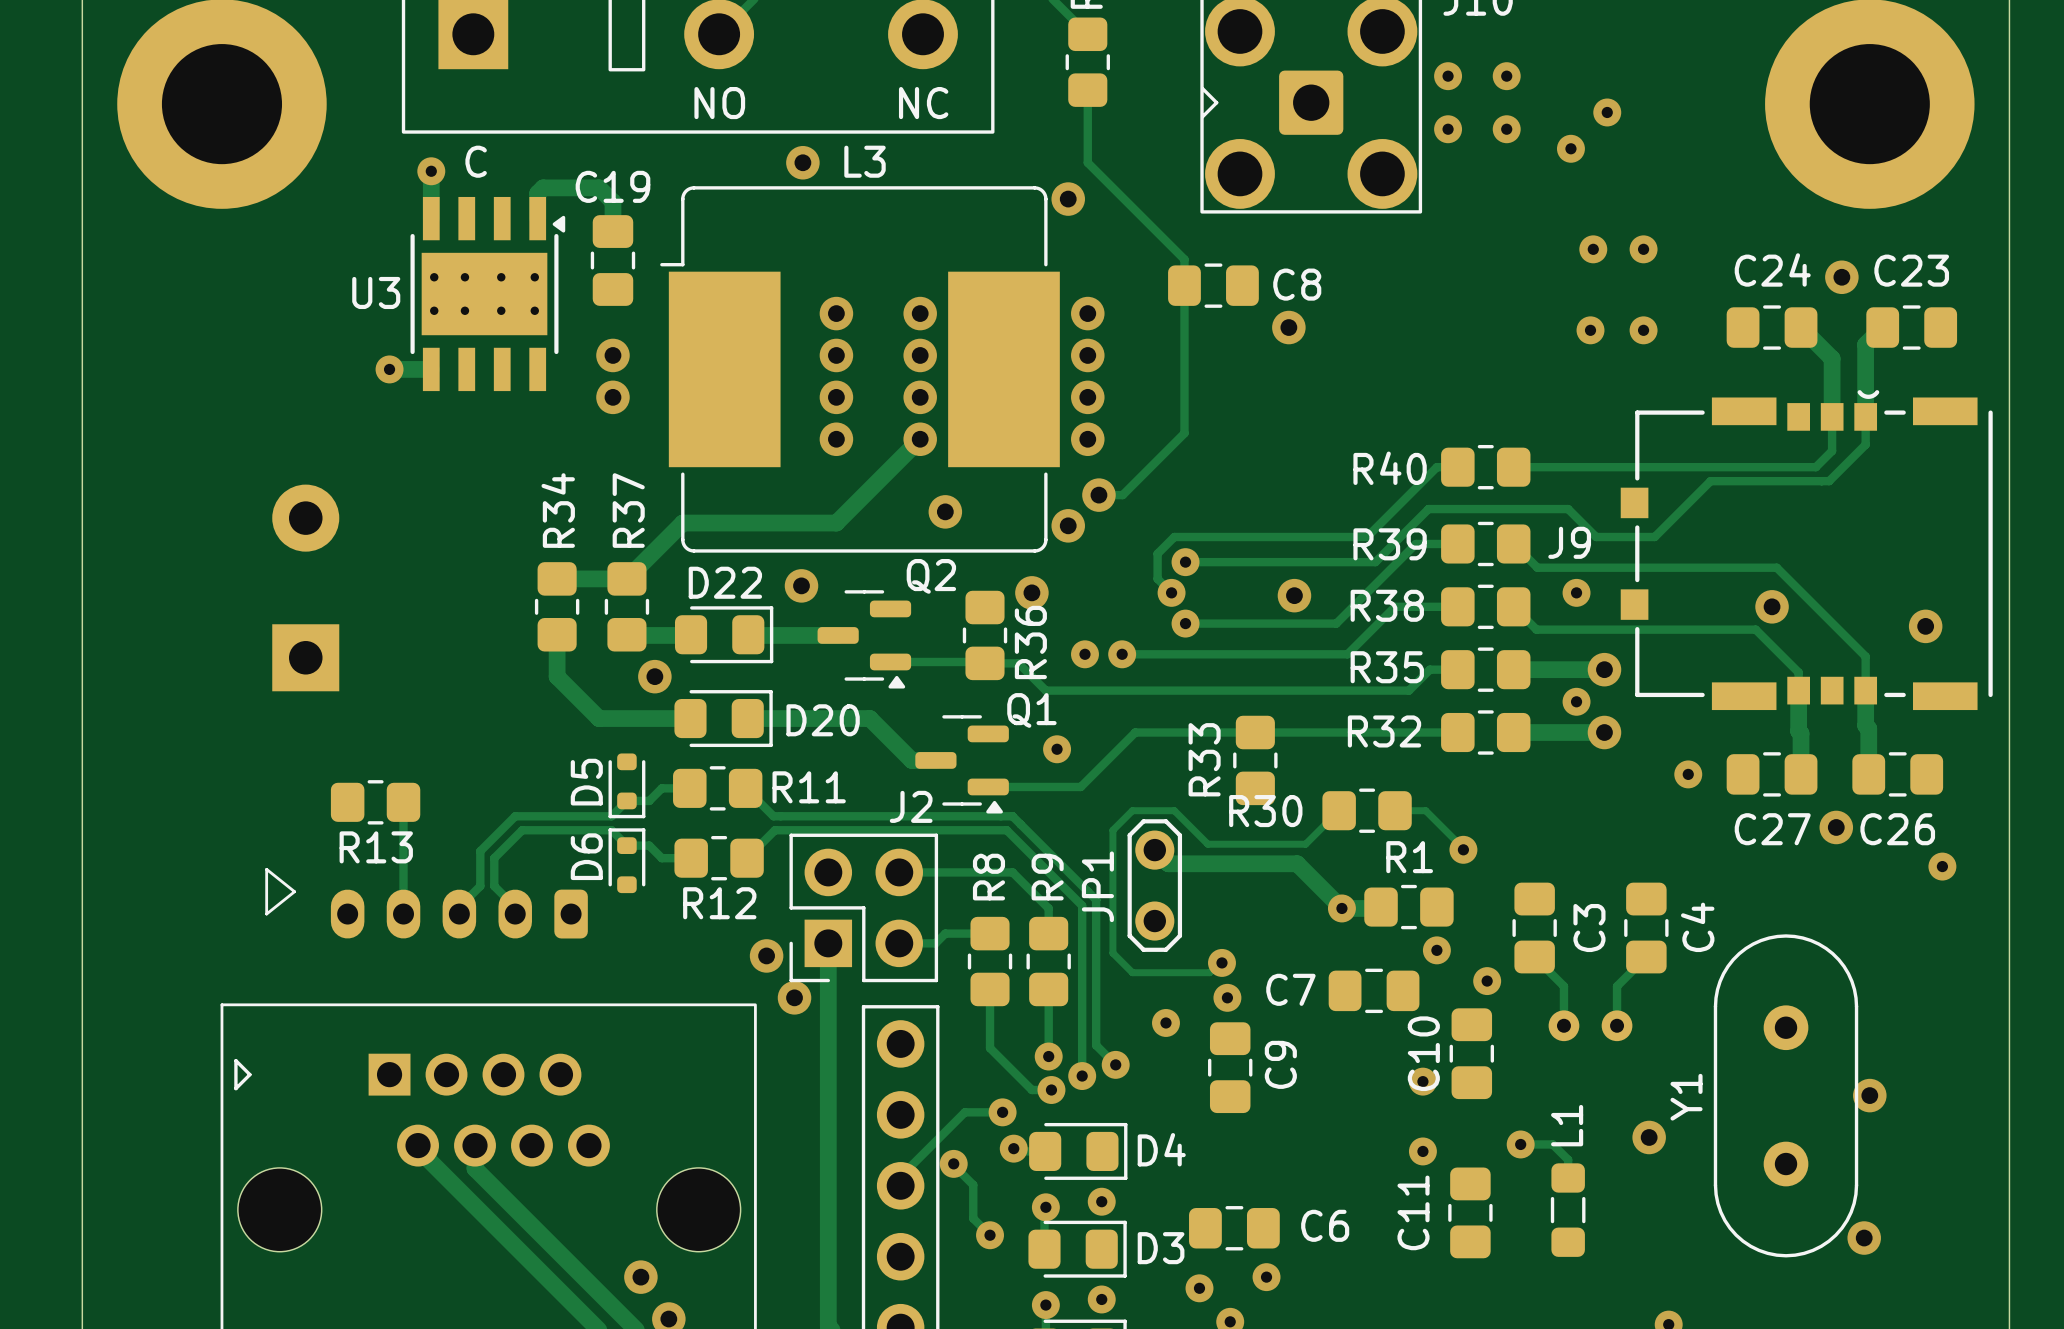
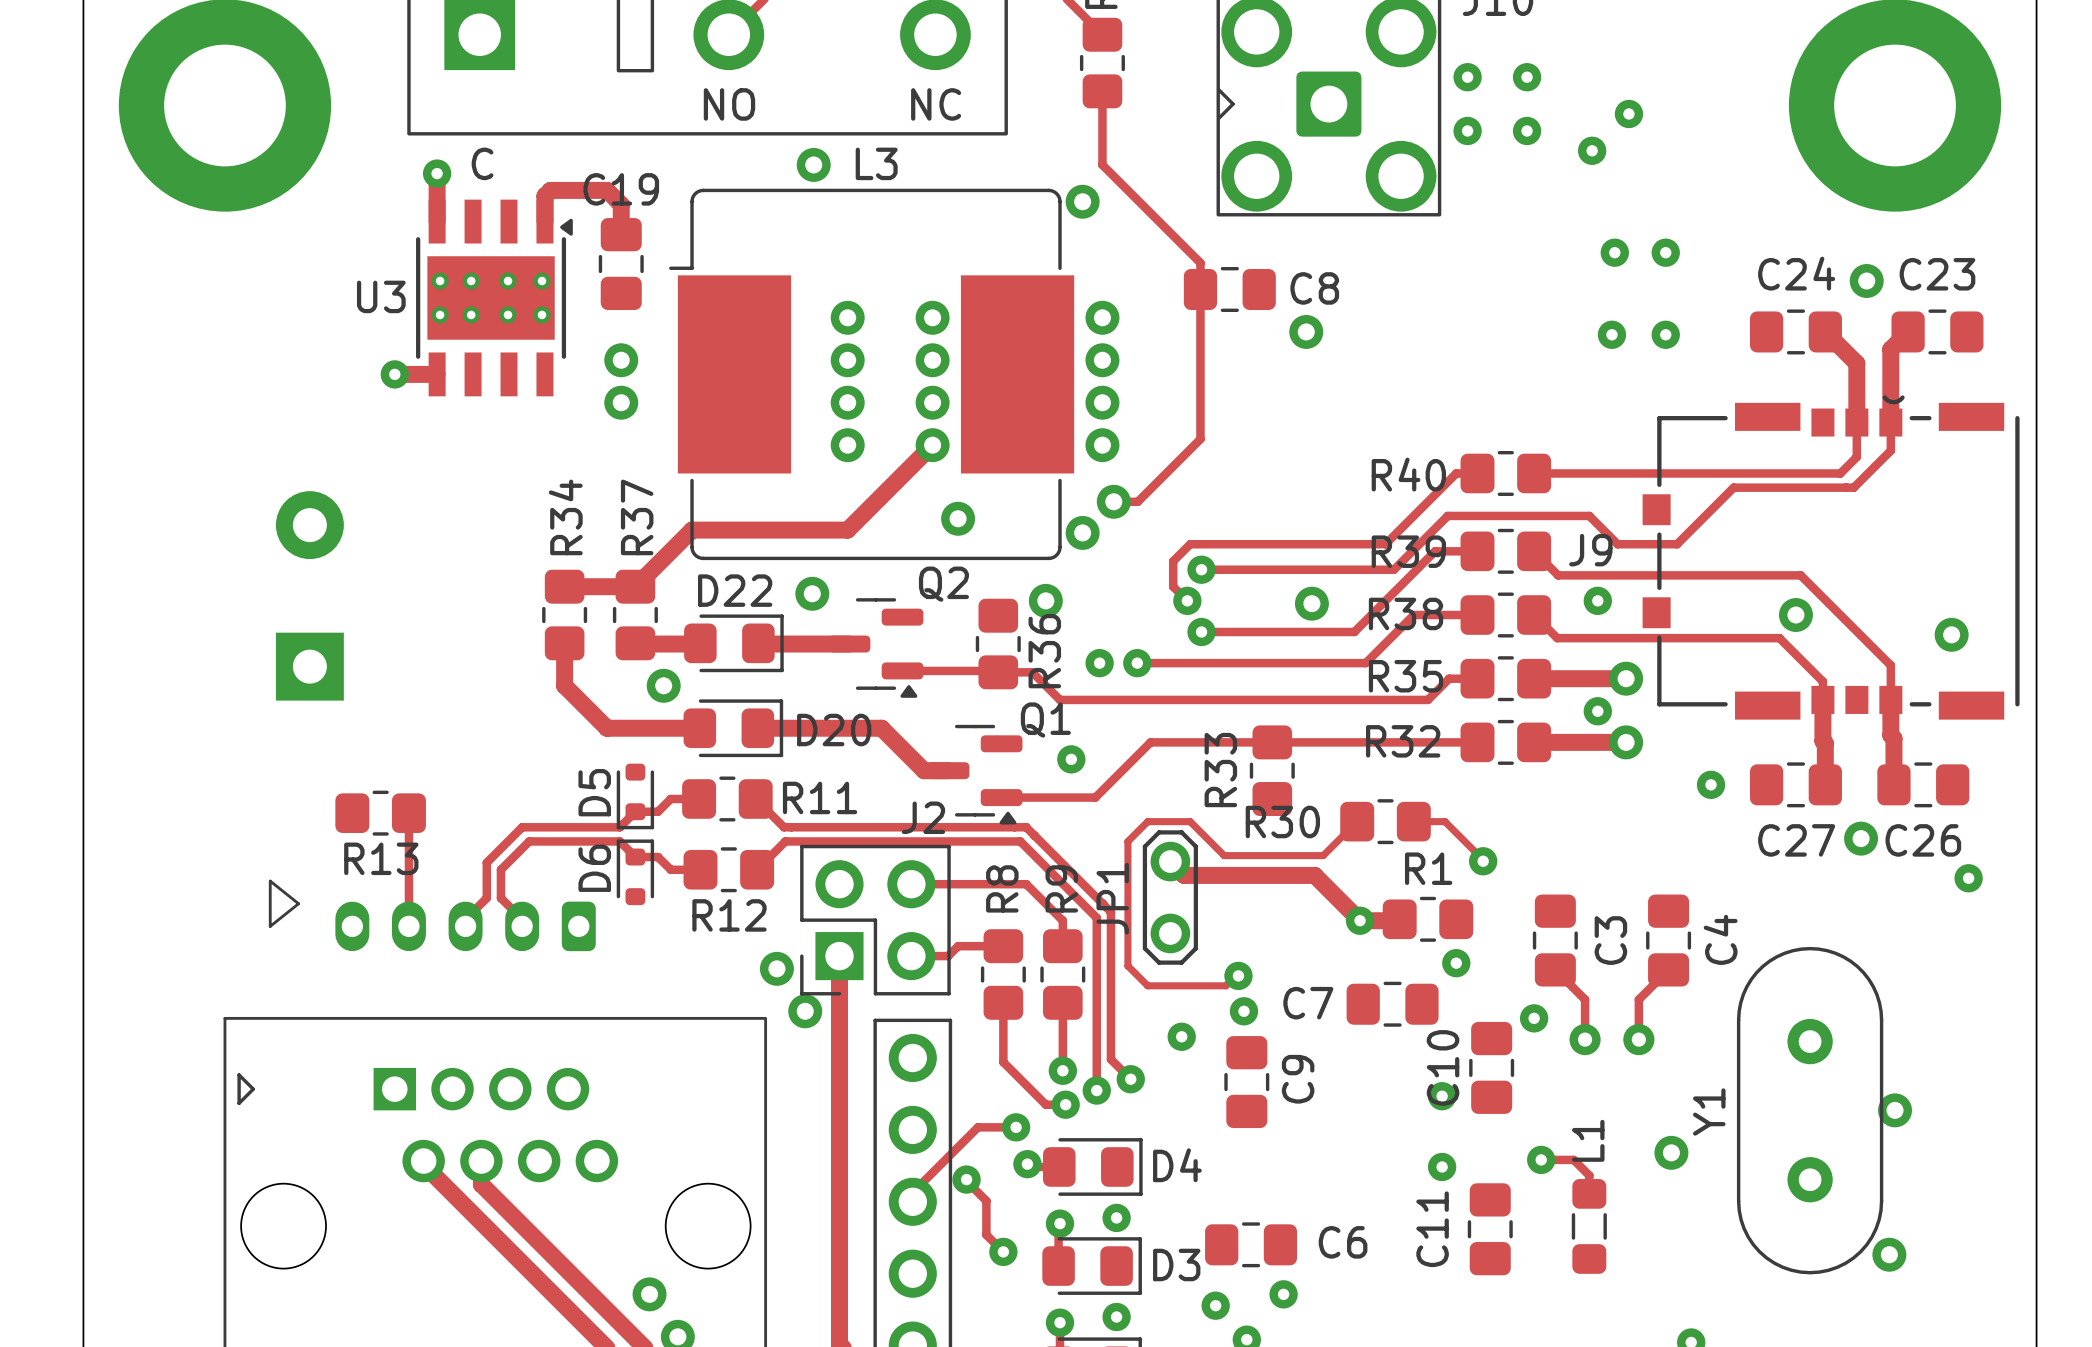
via position: (1487, 981) -> (1534, 1018)

